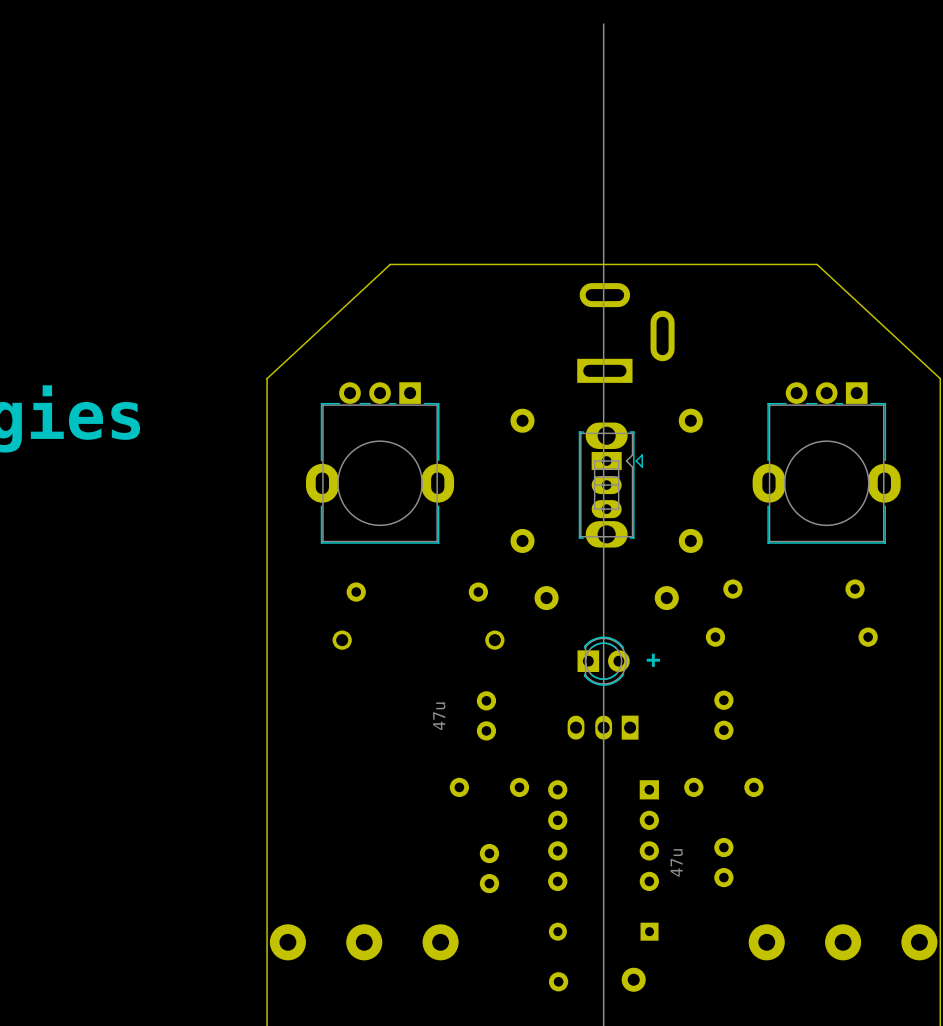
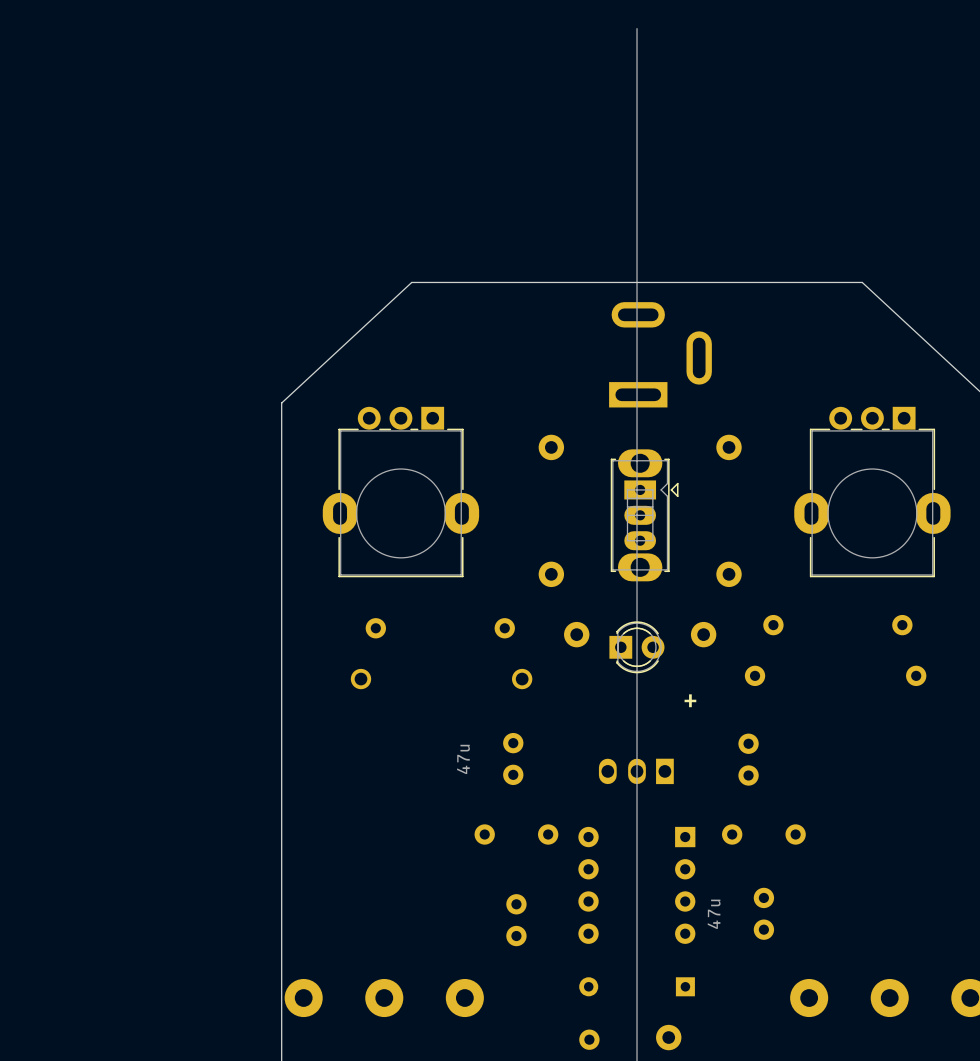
part position: (603, 661) -> (636, 647)
part position: (723, 715) -> (748, 759)

